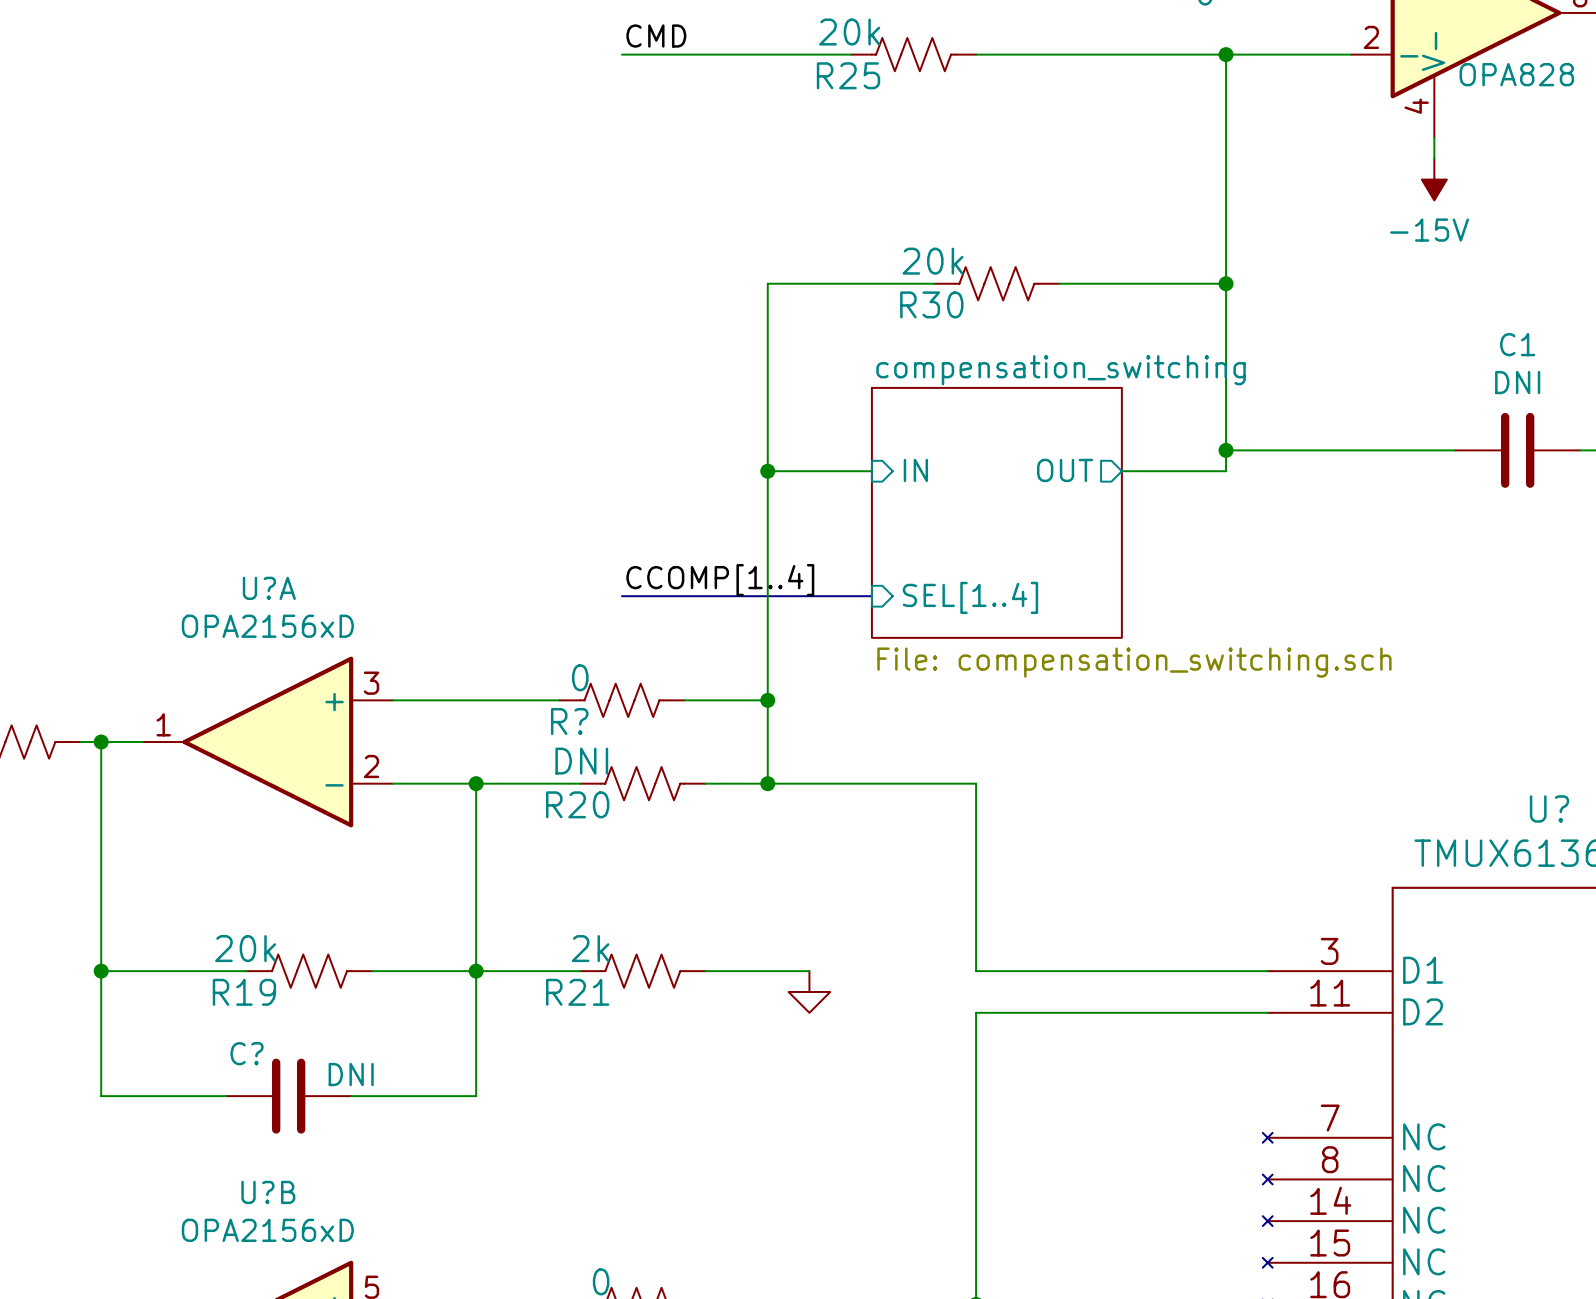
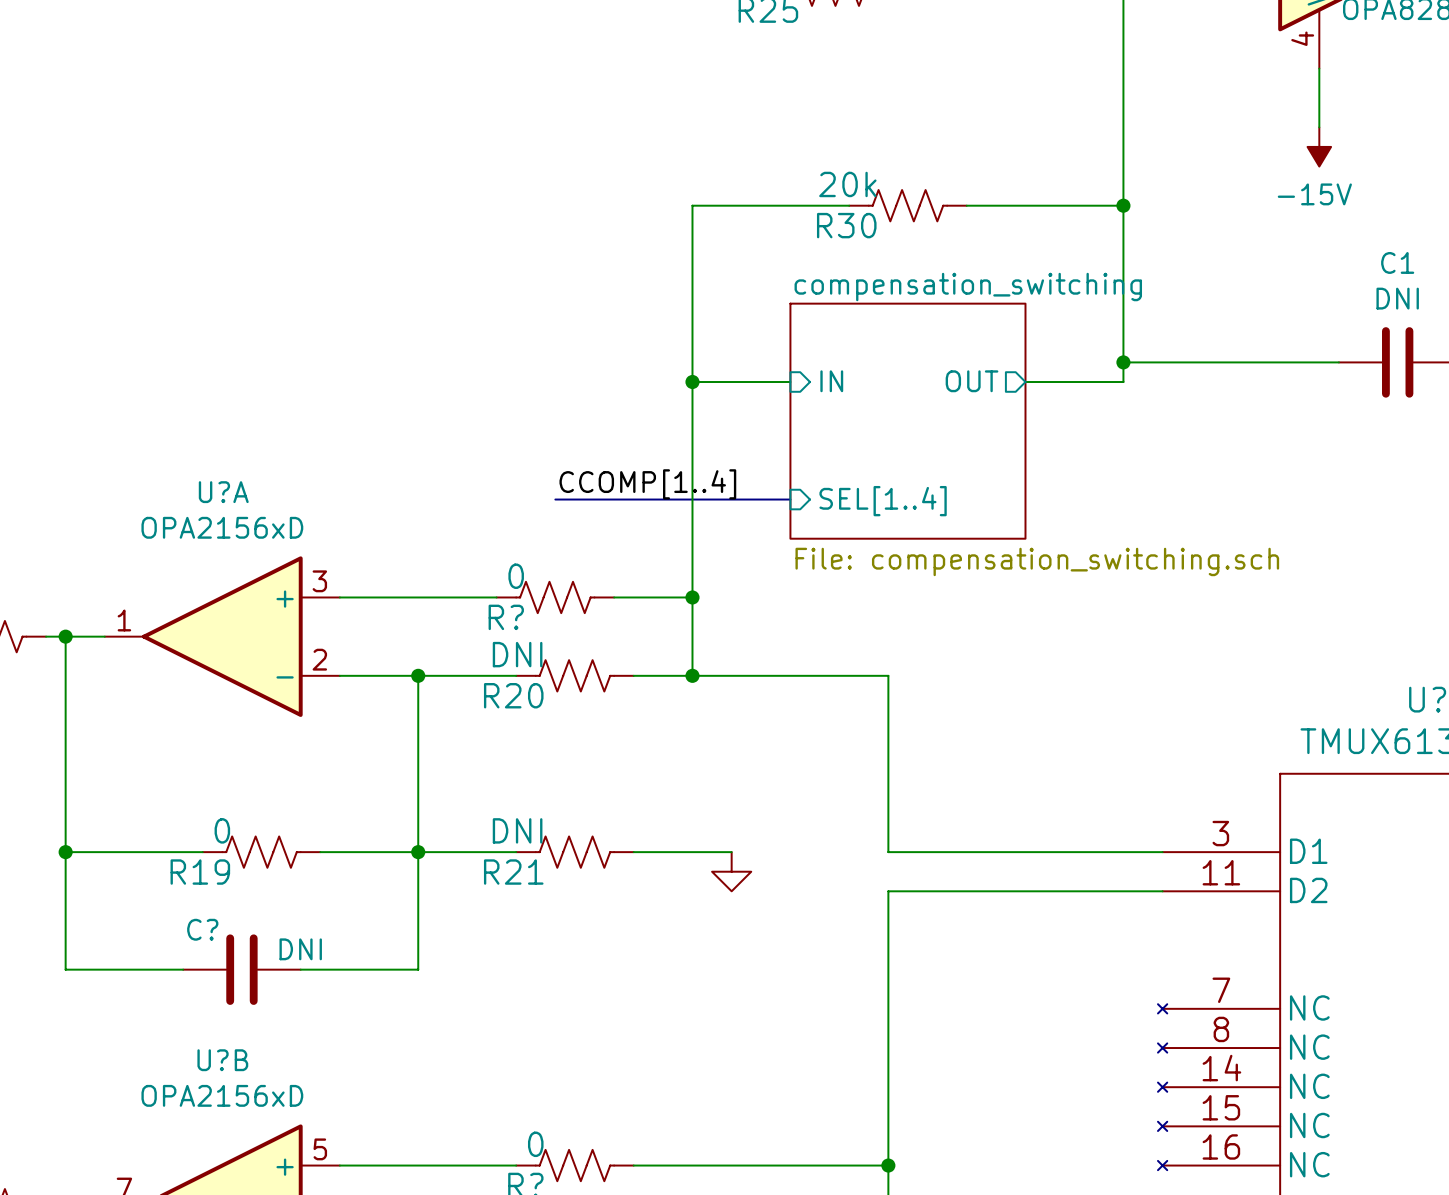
power symbol position: -15V (1434, 179) -> -15V (1319, 146)
R19 value: 20k (245, 948) -> 0 (222, 830)
R21 value: 2k (590, 948) -> DNI (517, 830)

